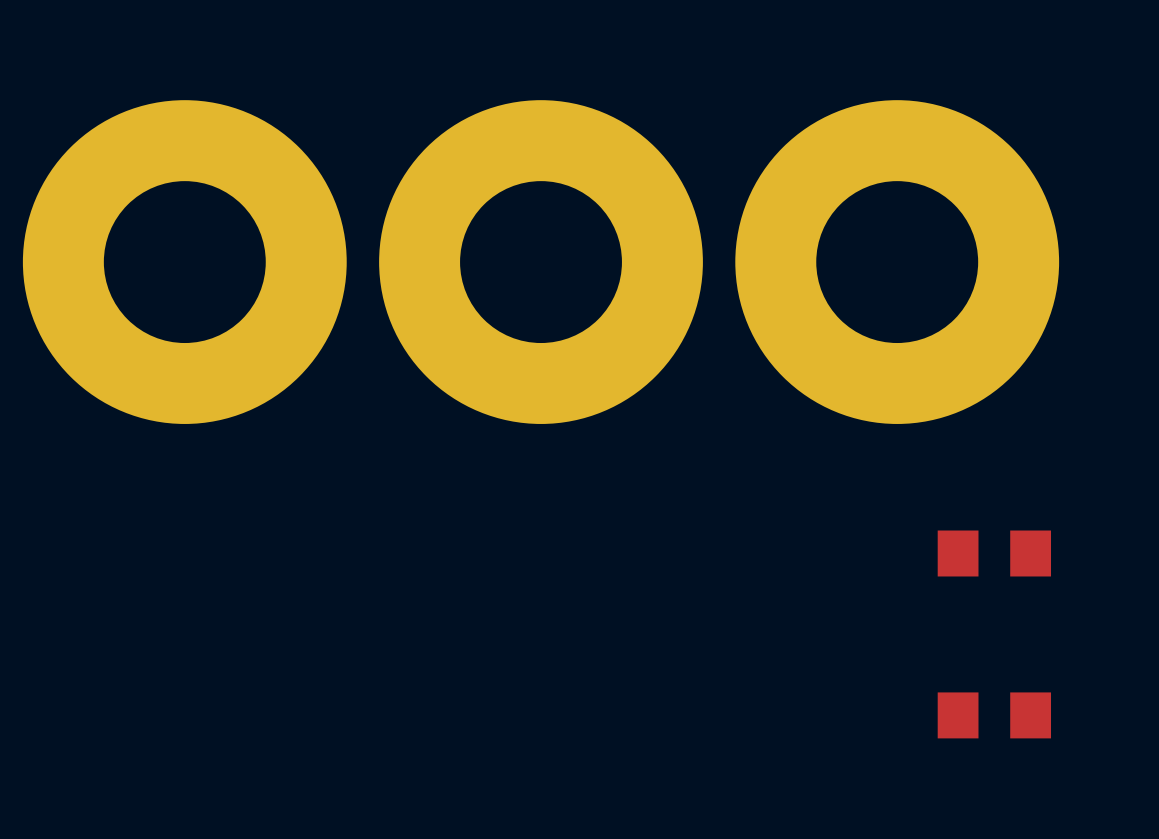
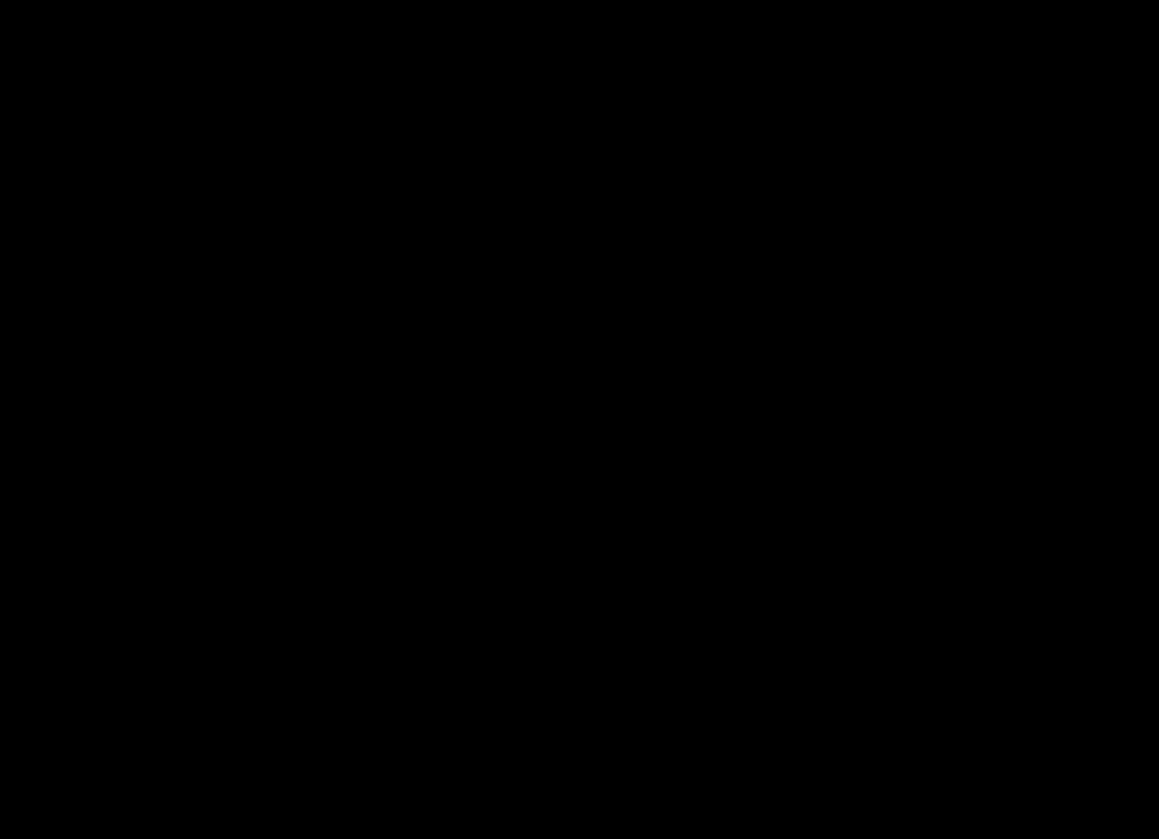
part: (184, 262) -> none
part: (541, 262) -> none
part: (897, 262) -> none
part: (994, 553) -> none
part: (994, 715) -> none

